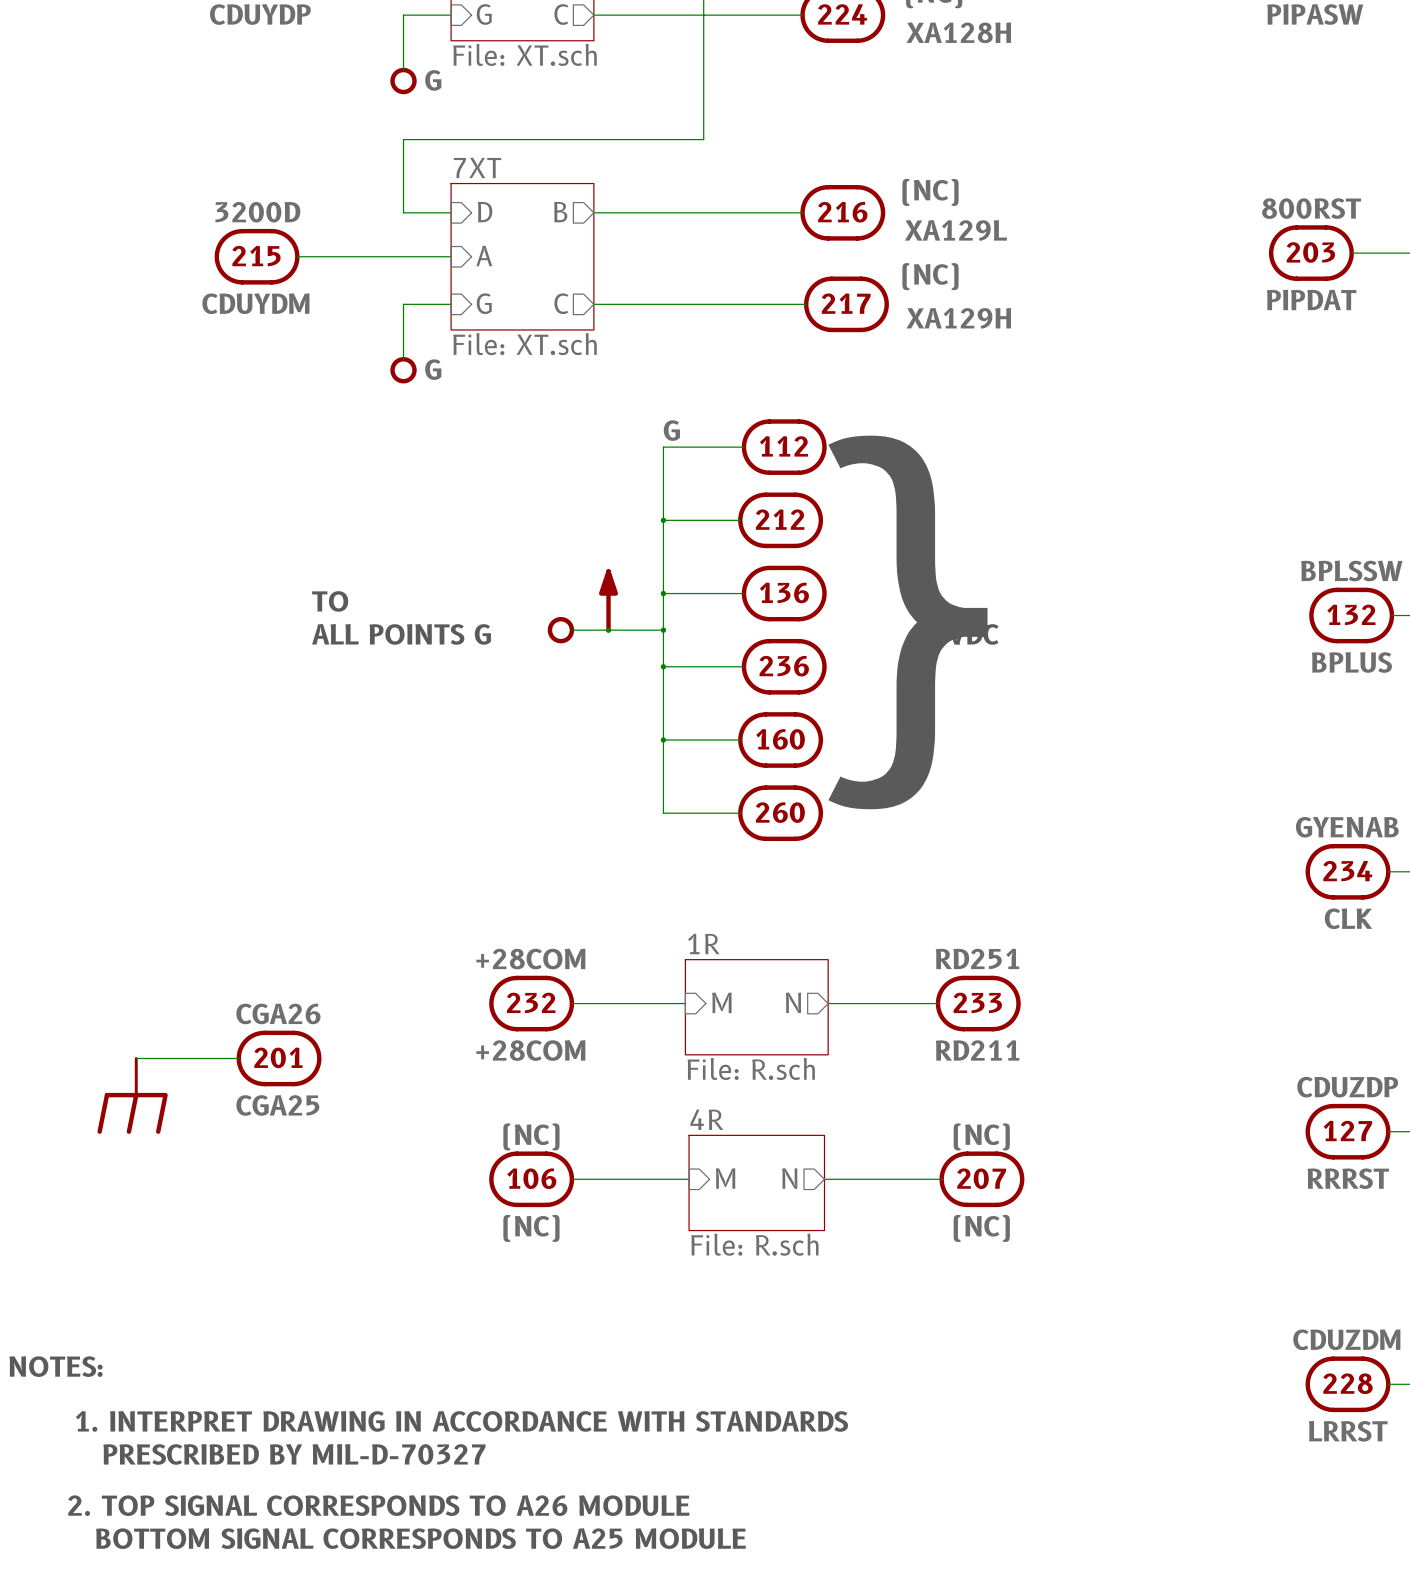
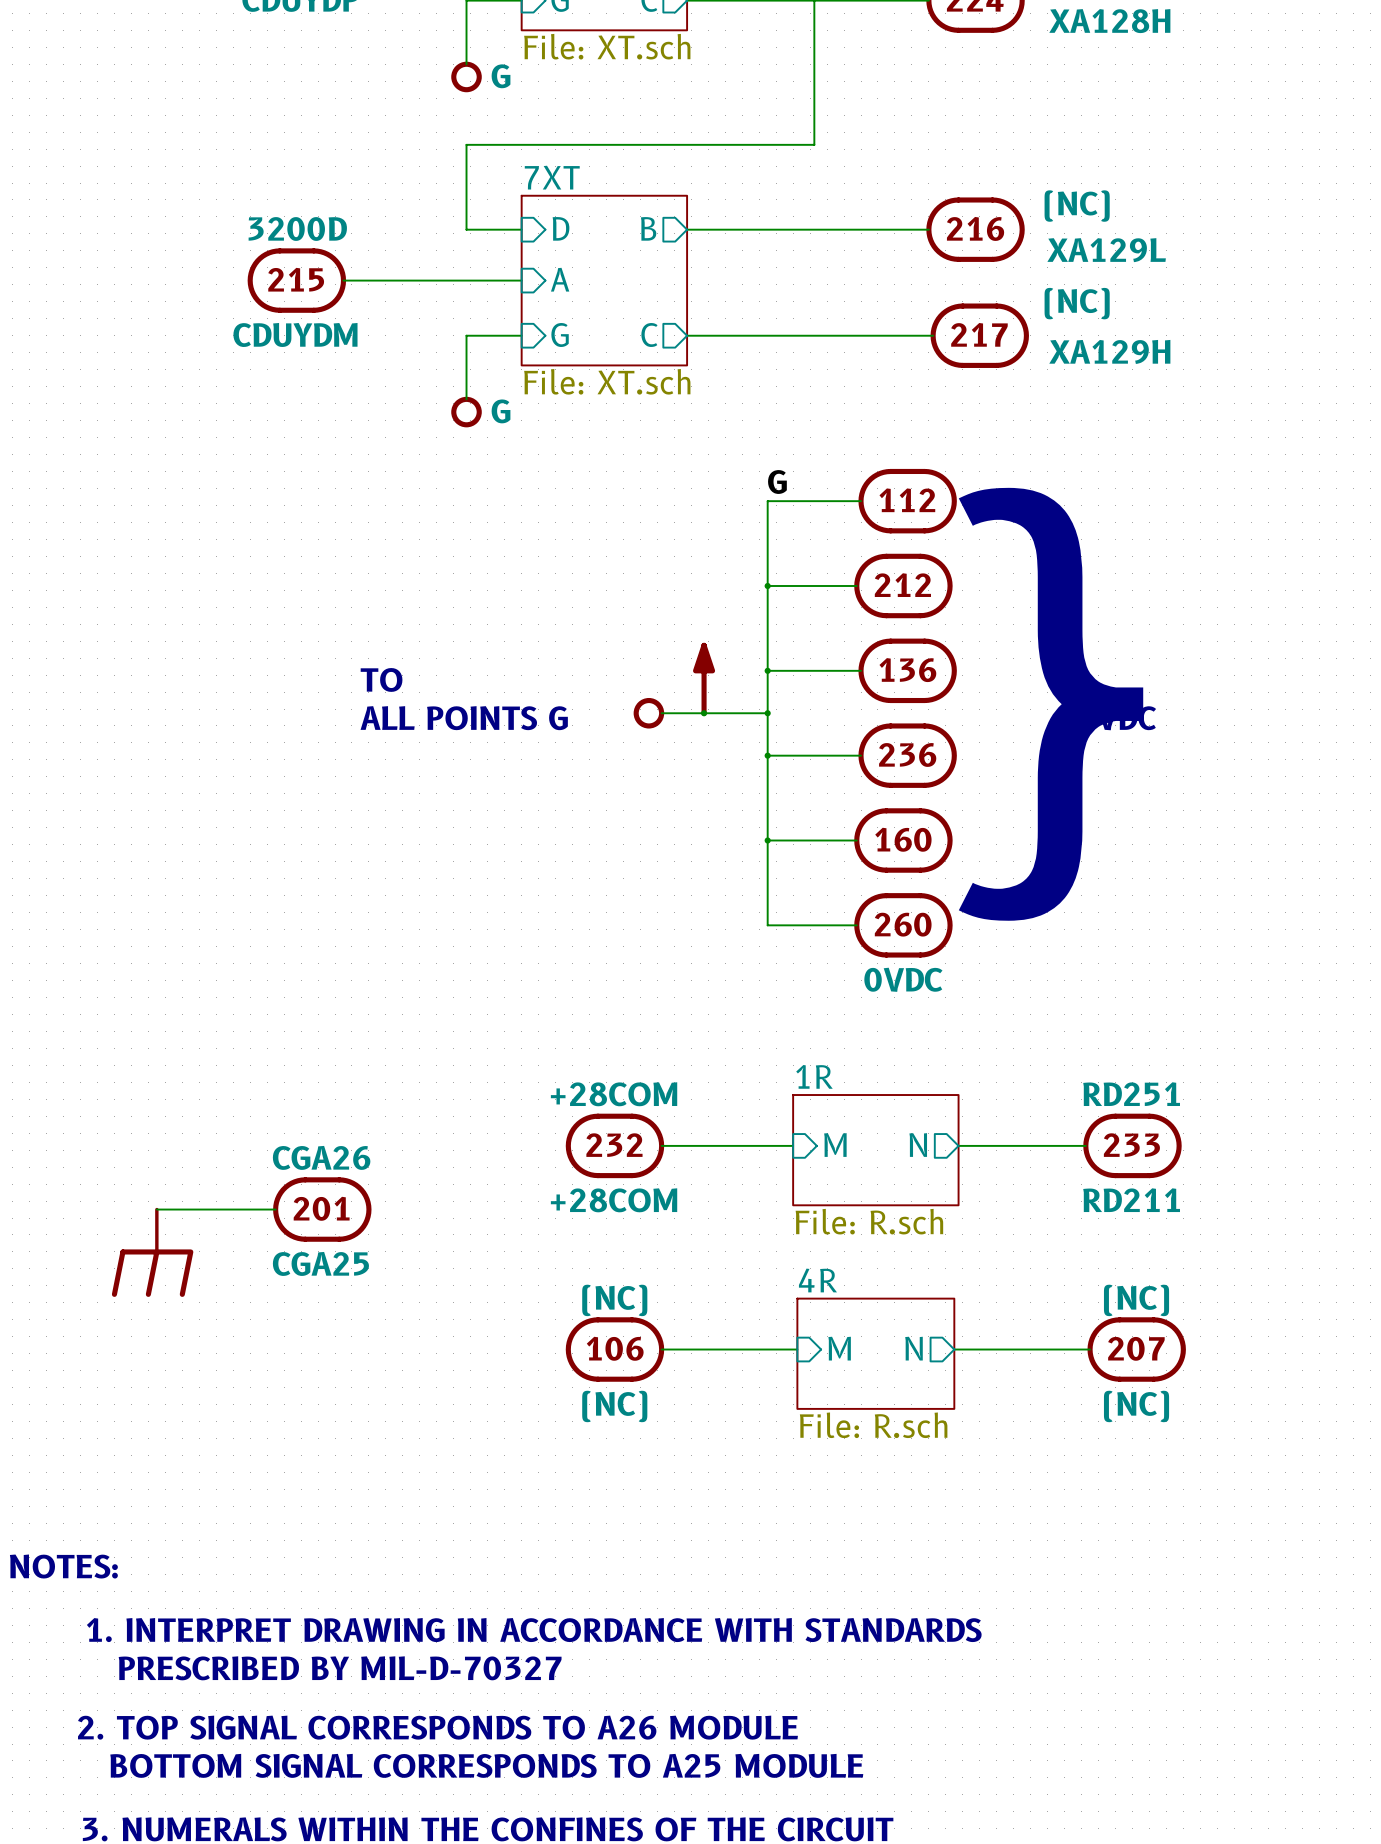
part text: none -> 0VDC (903, 979)

